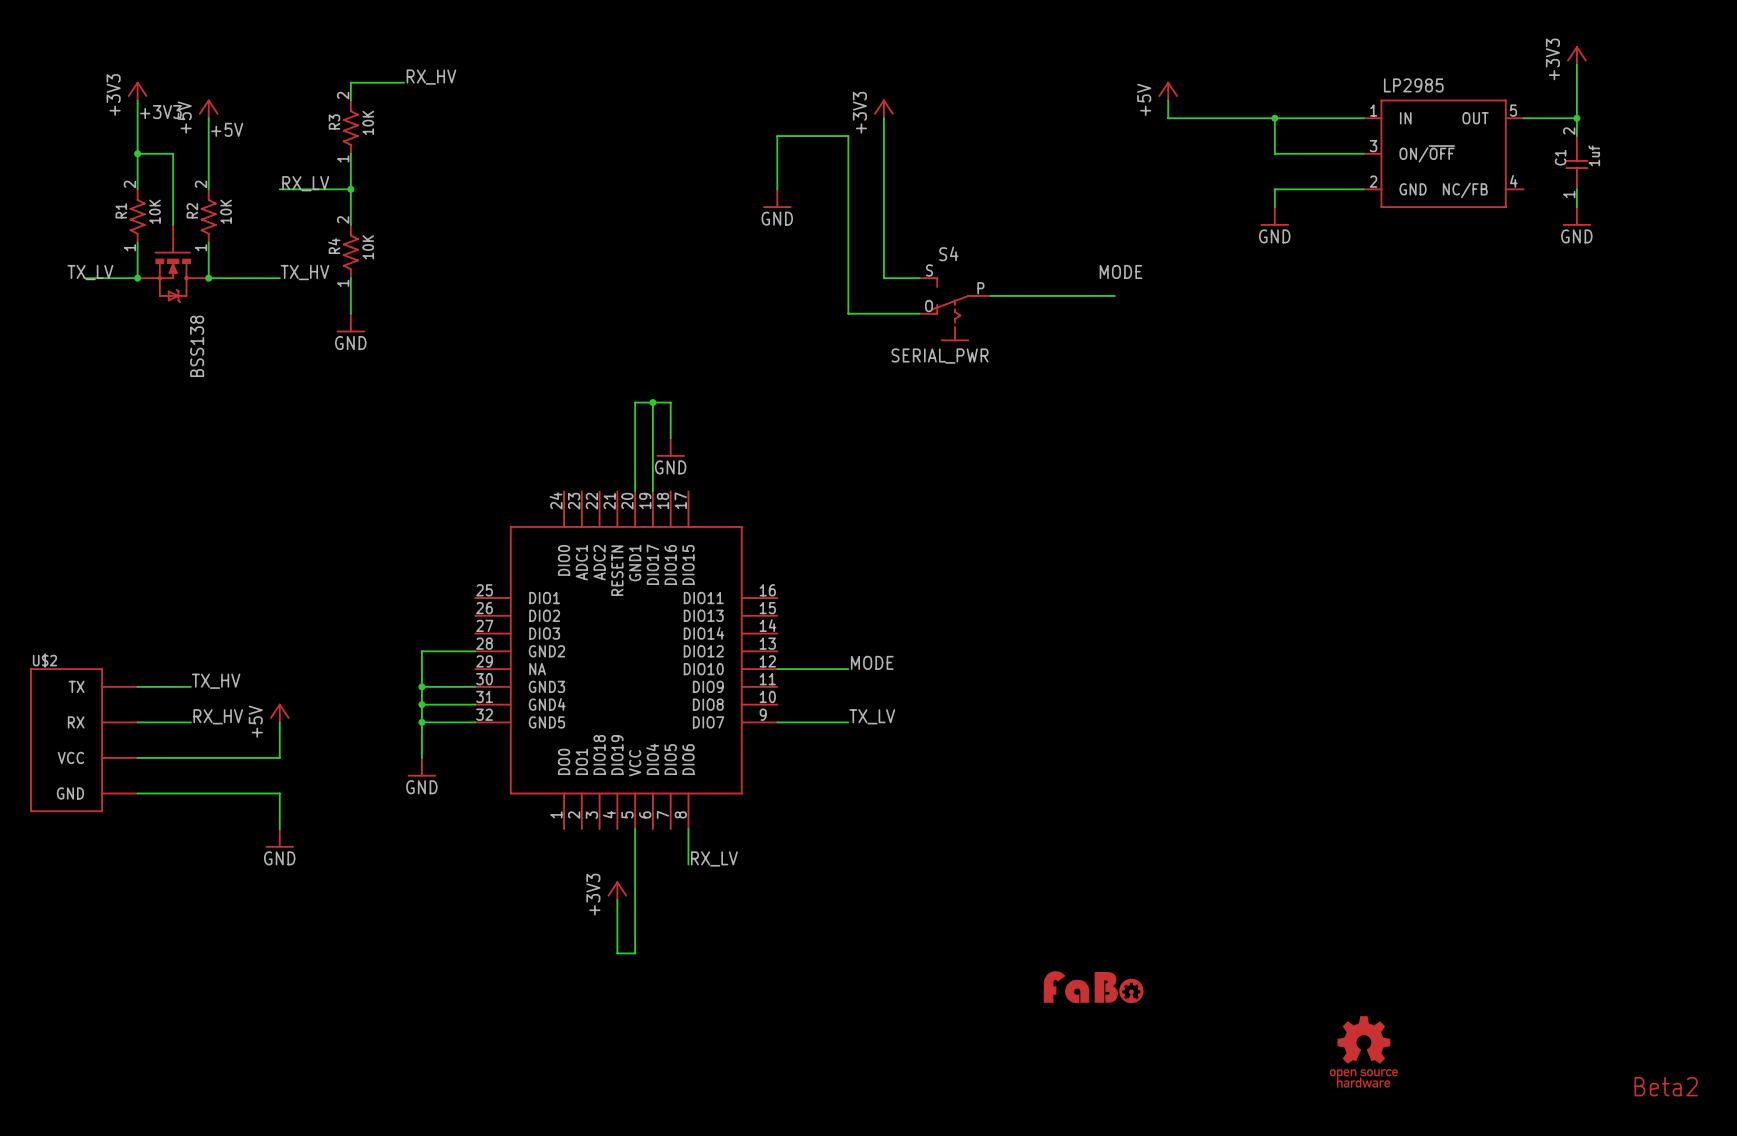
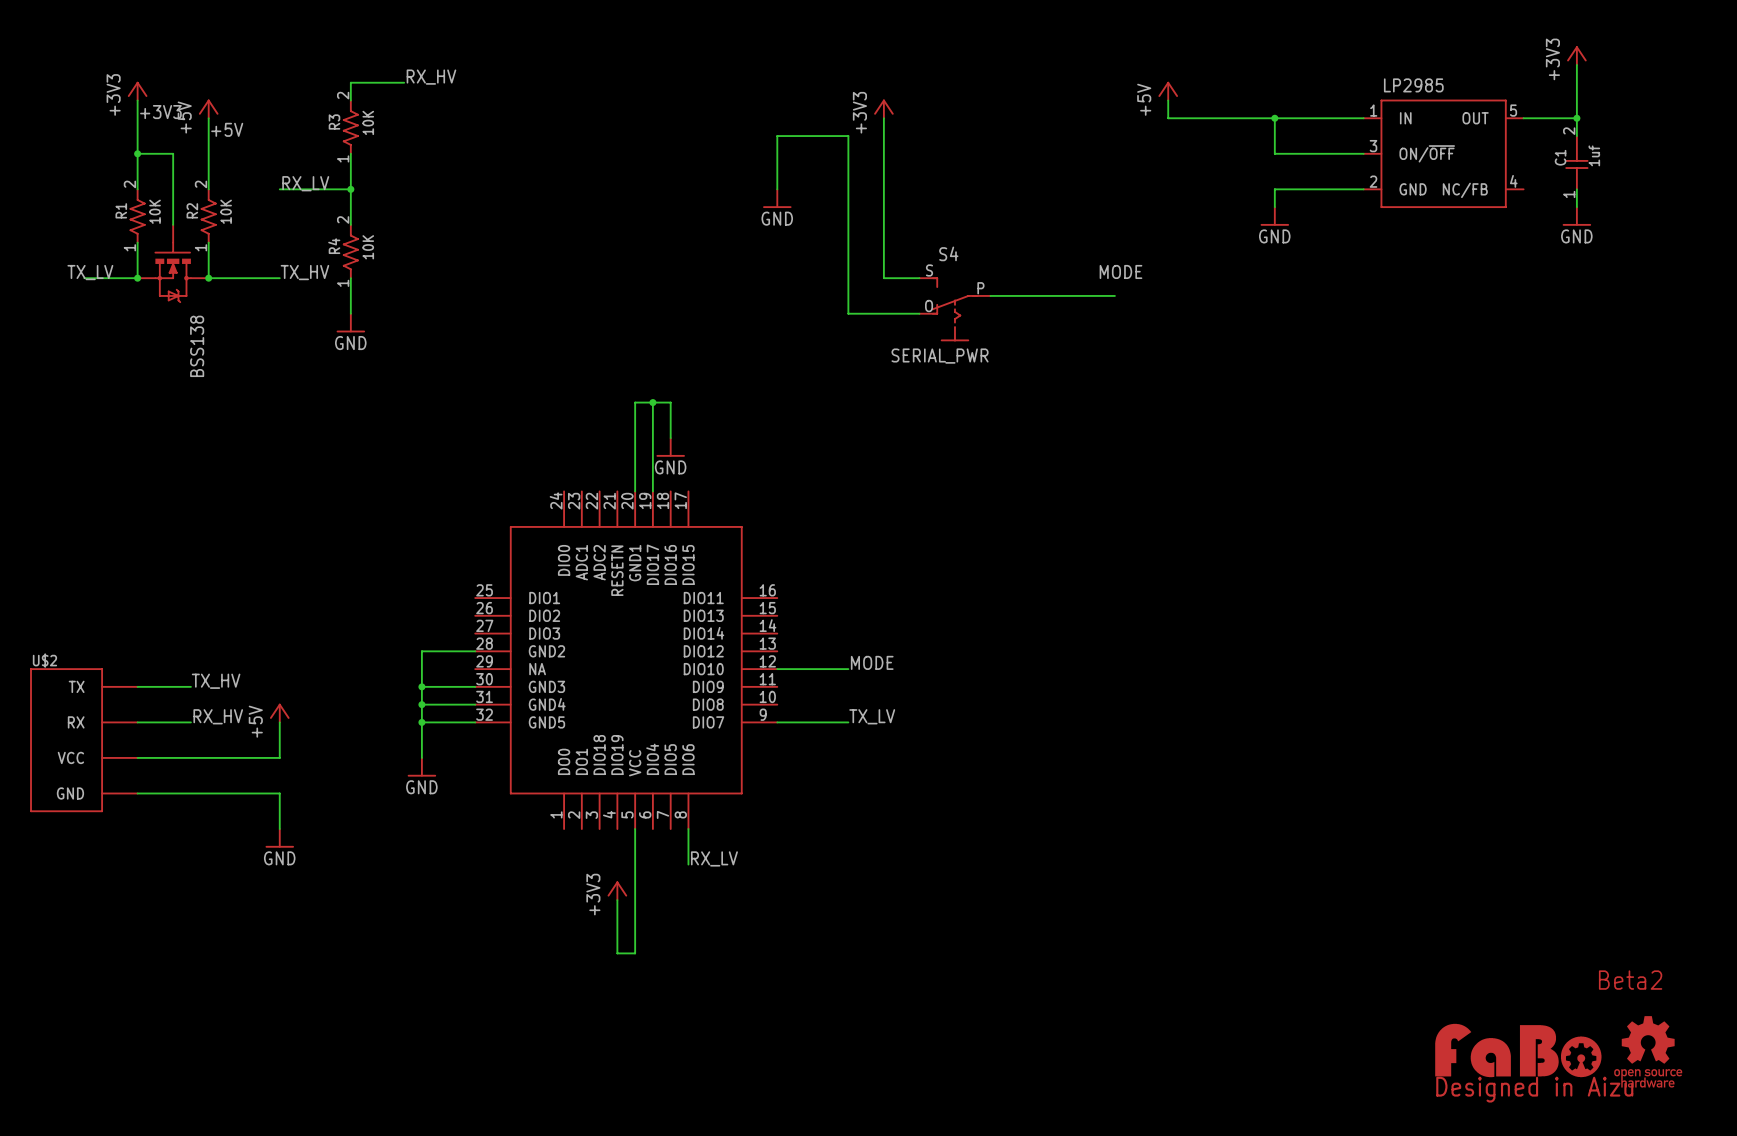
part: (1093, 987) -> none
part: none -> (1518, 1050)
part: (1363, 1051) -> none
part: none -> (1648, 1051)
text position: Beta2 (1666, 1086) -> Beta2 (1630, 980)

